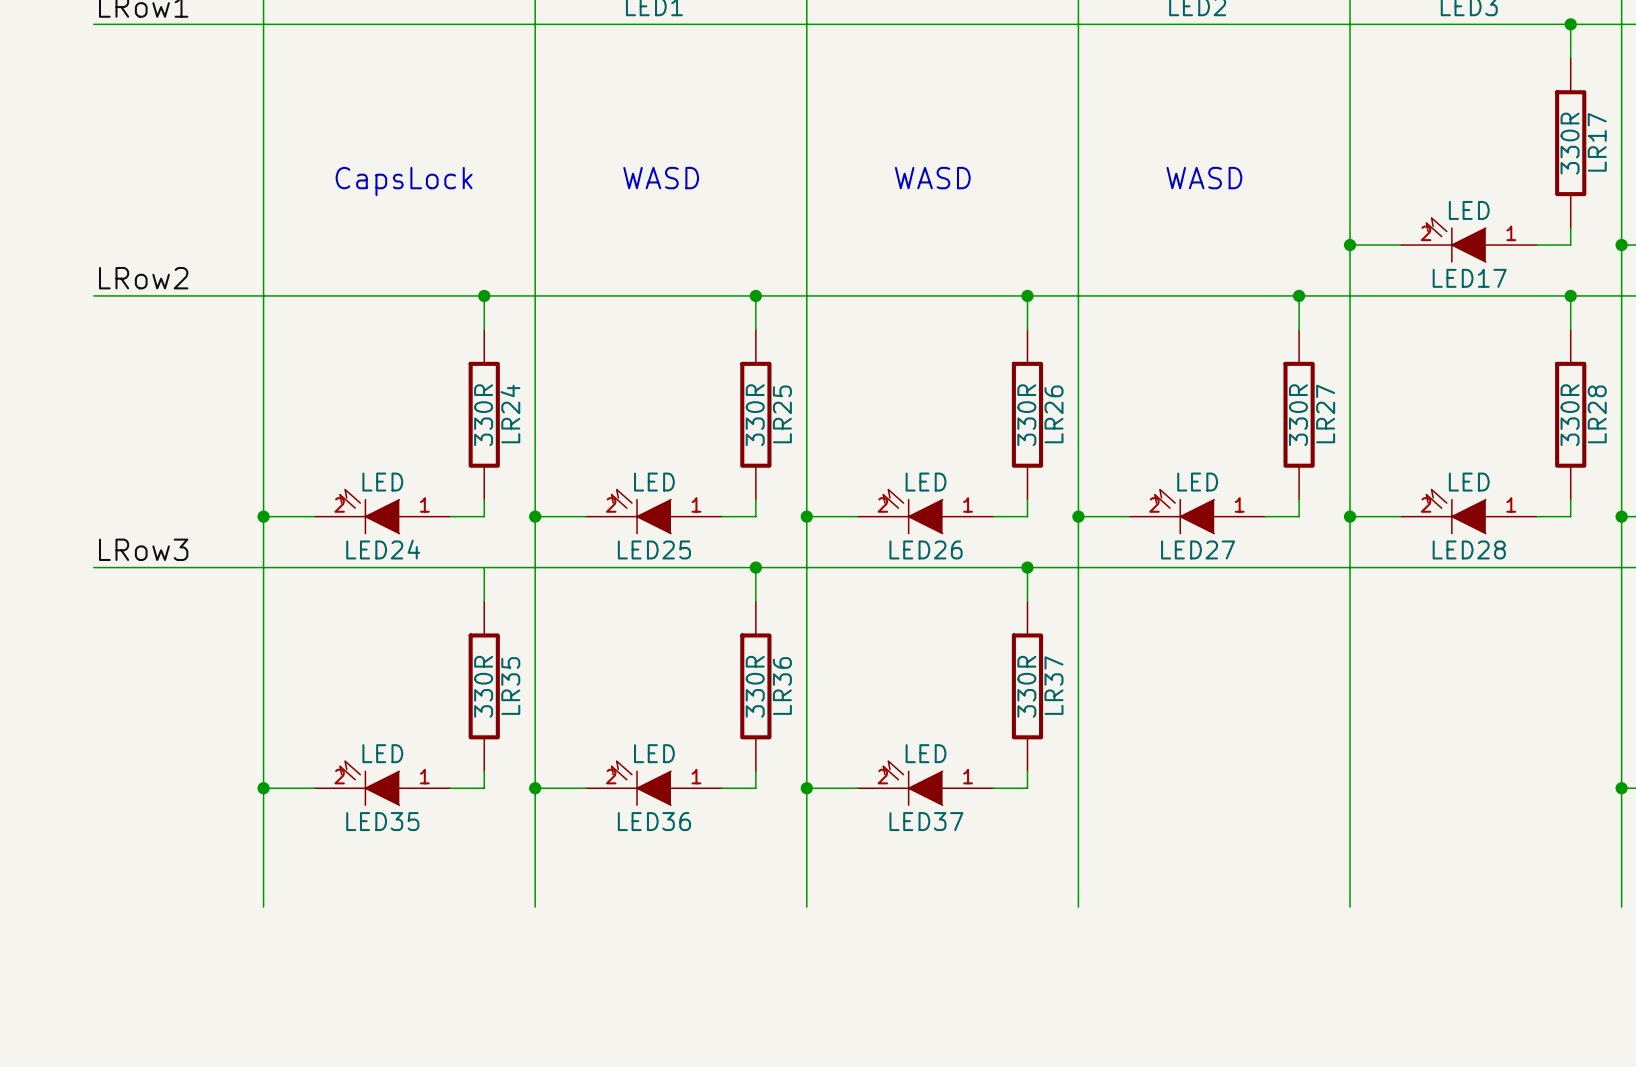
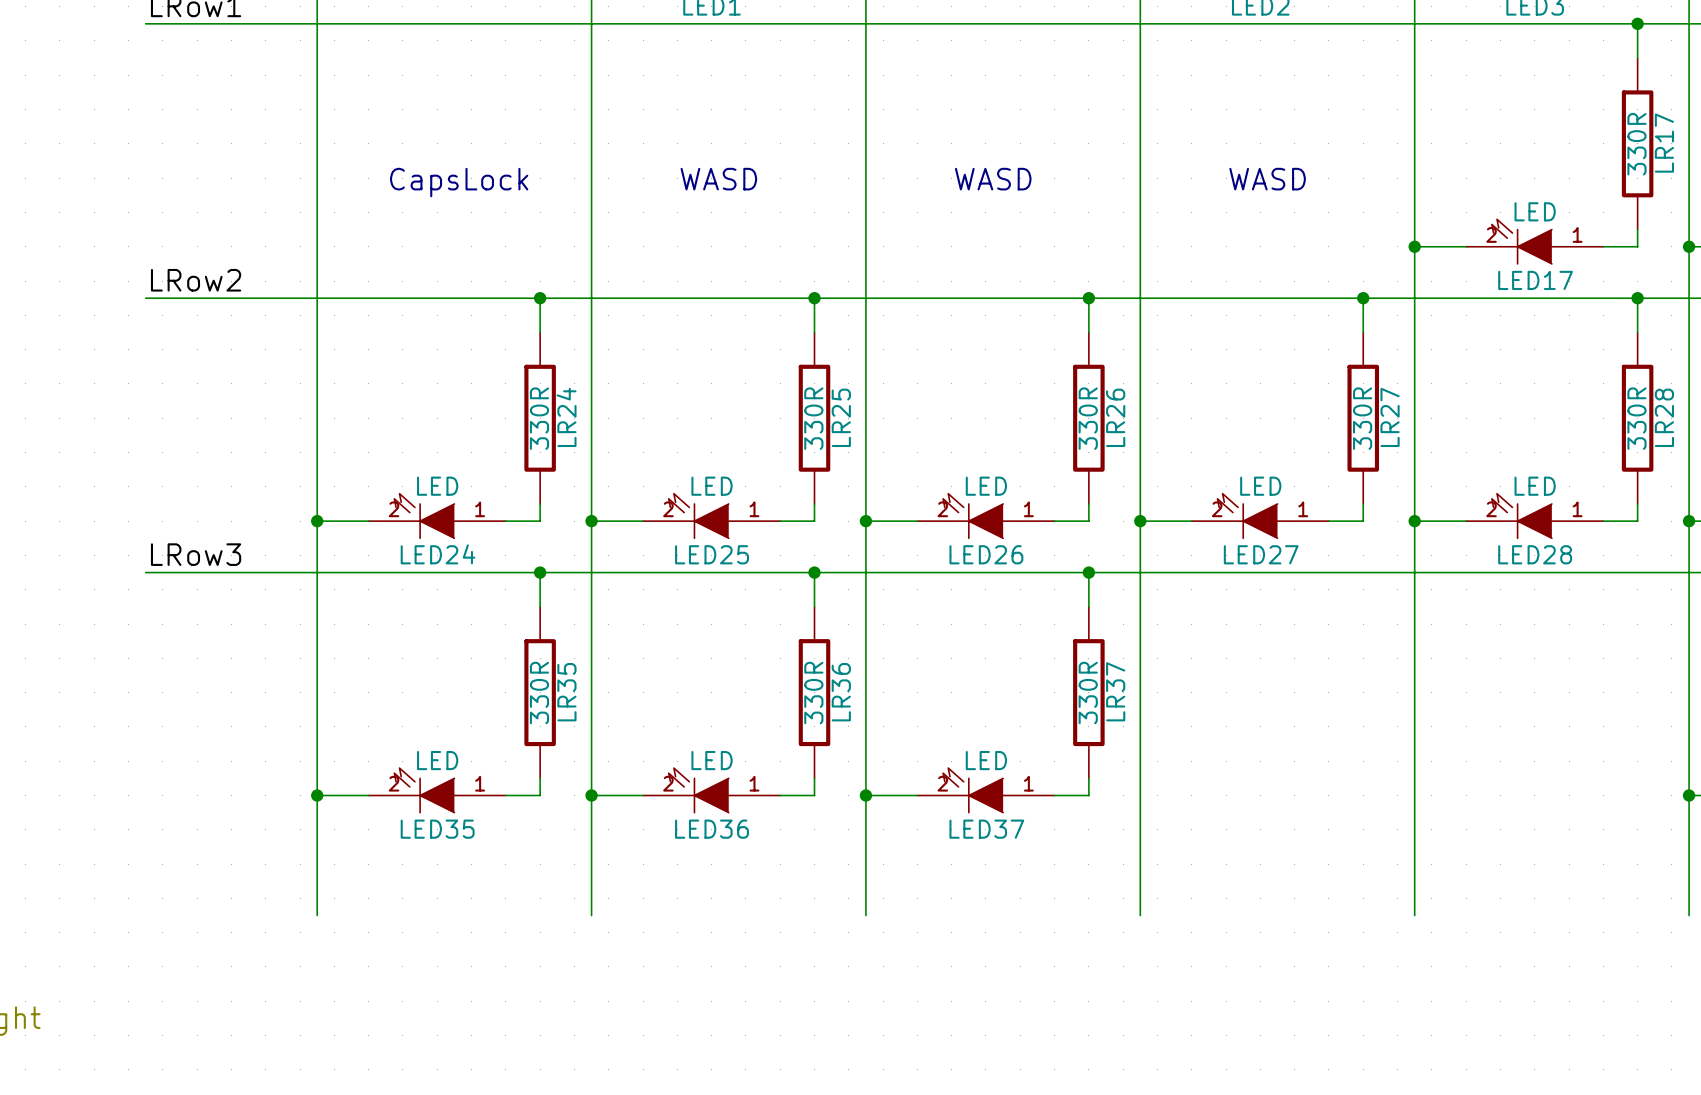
junction: none -> (540, 572)

